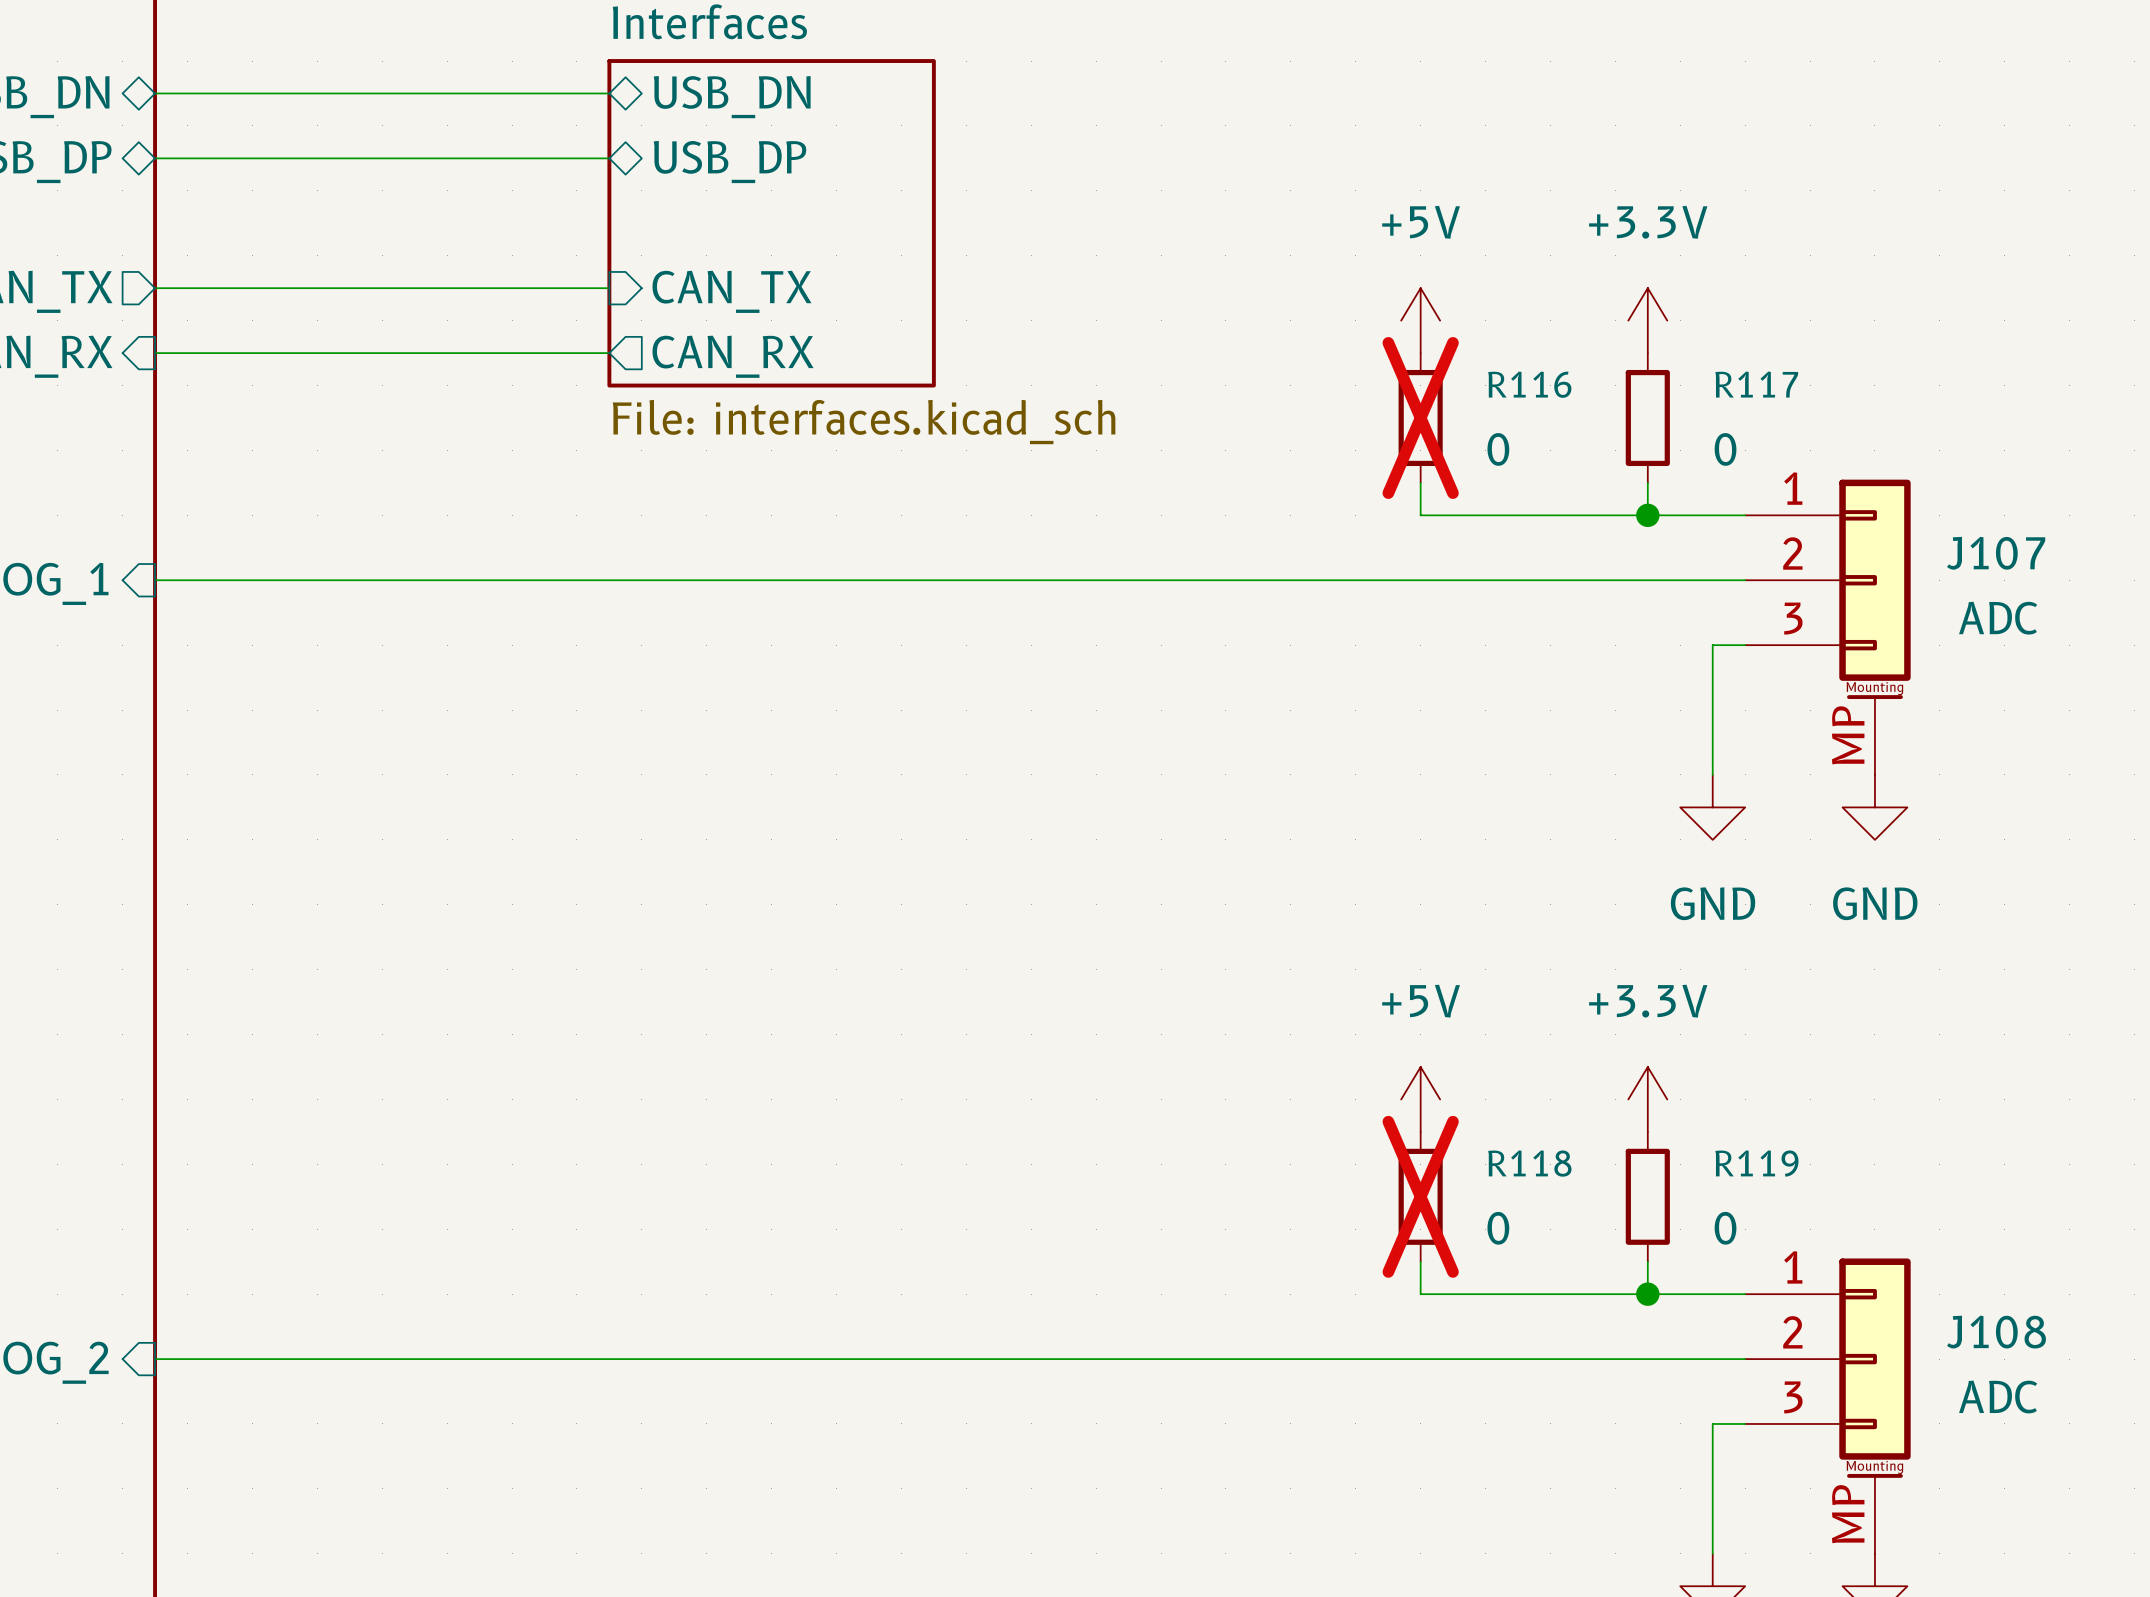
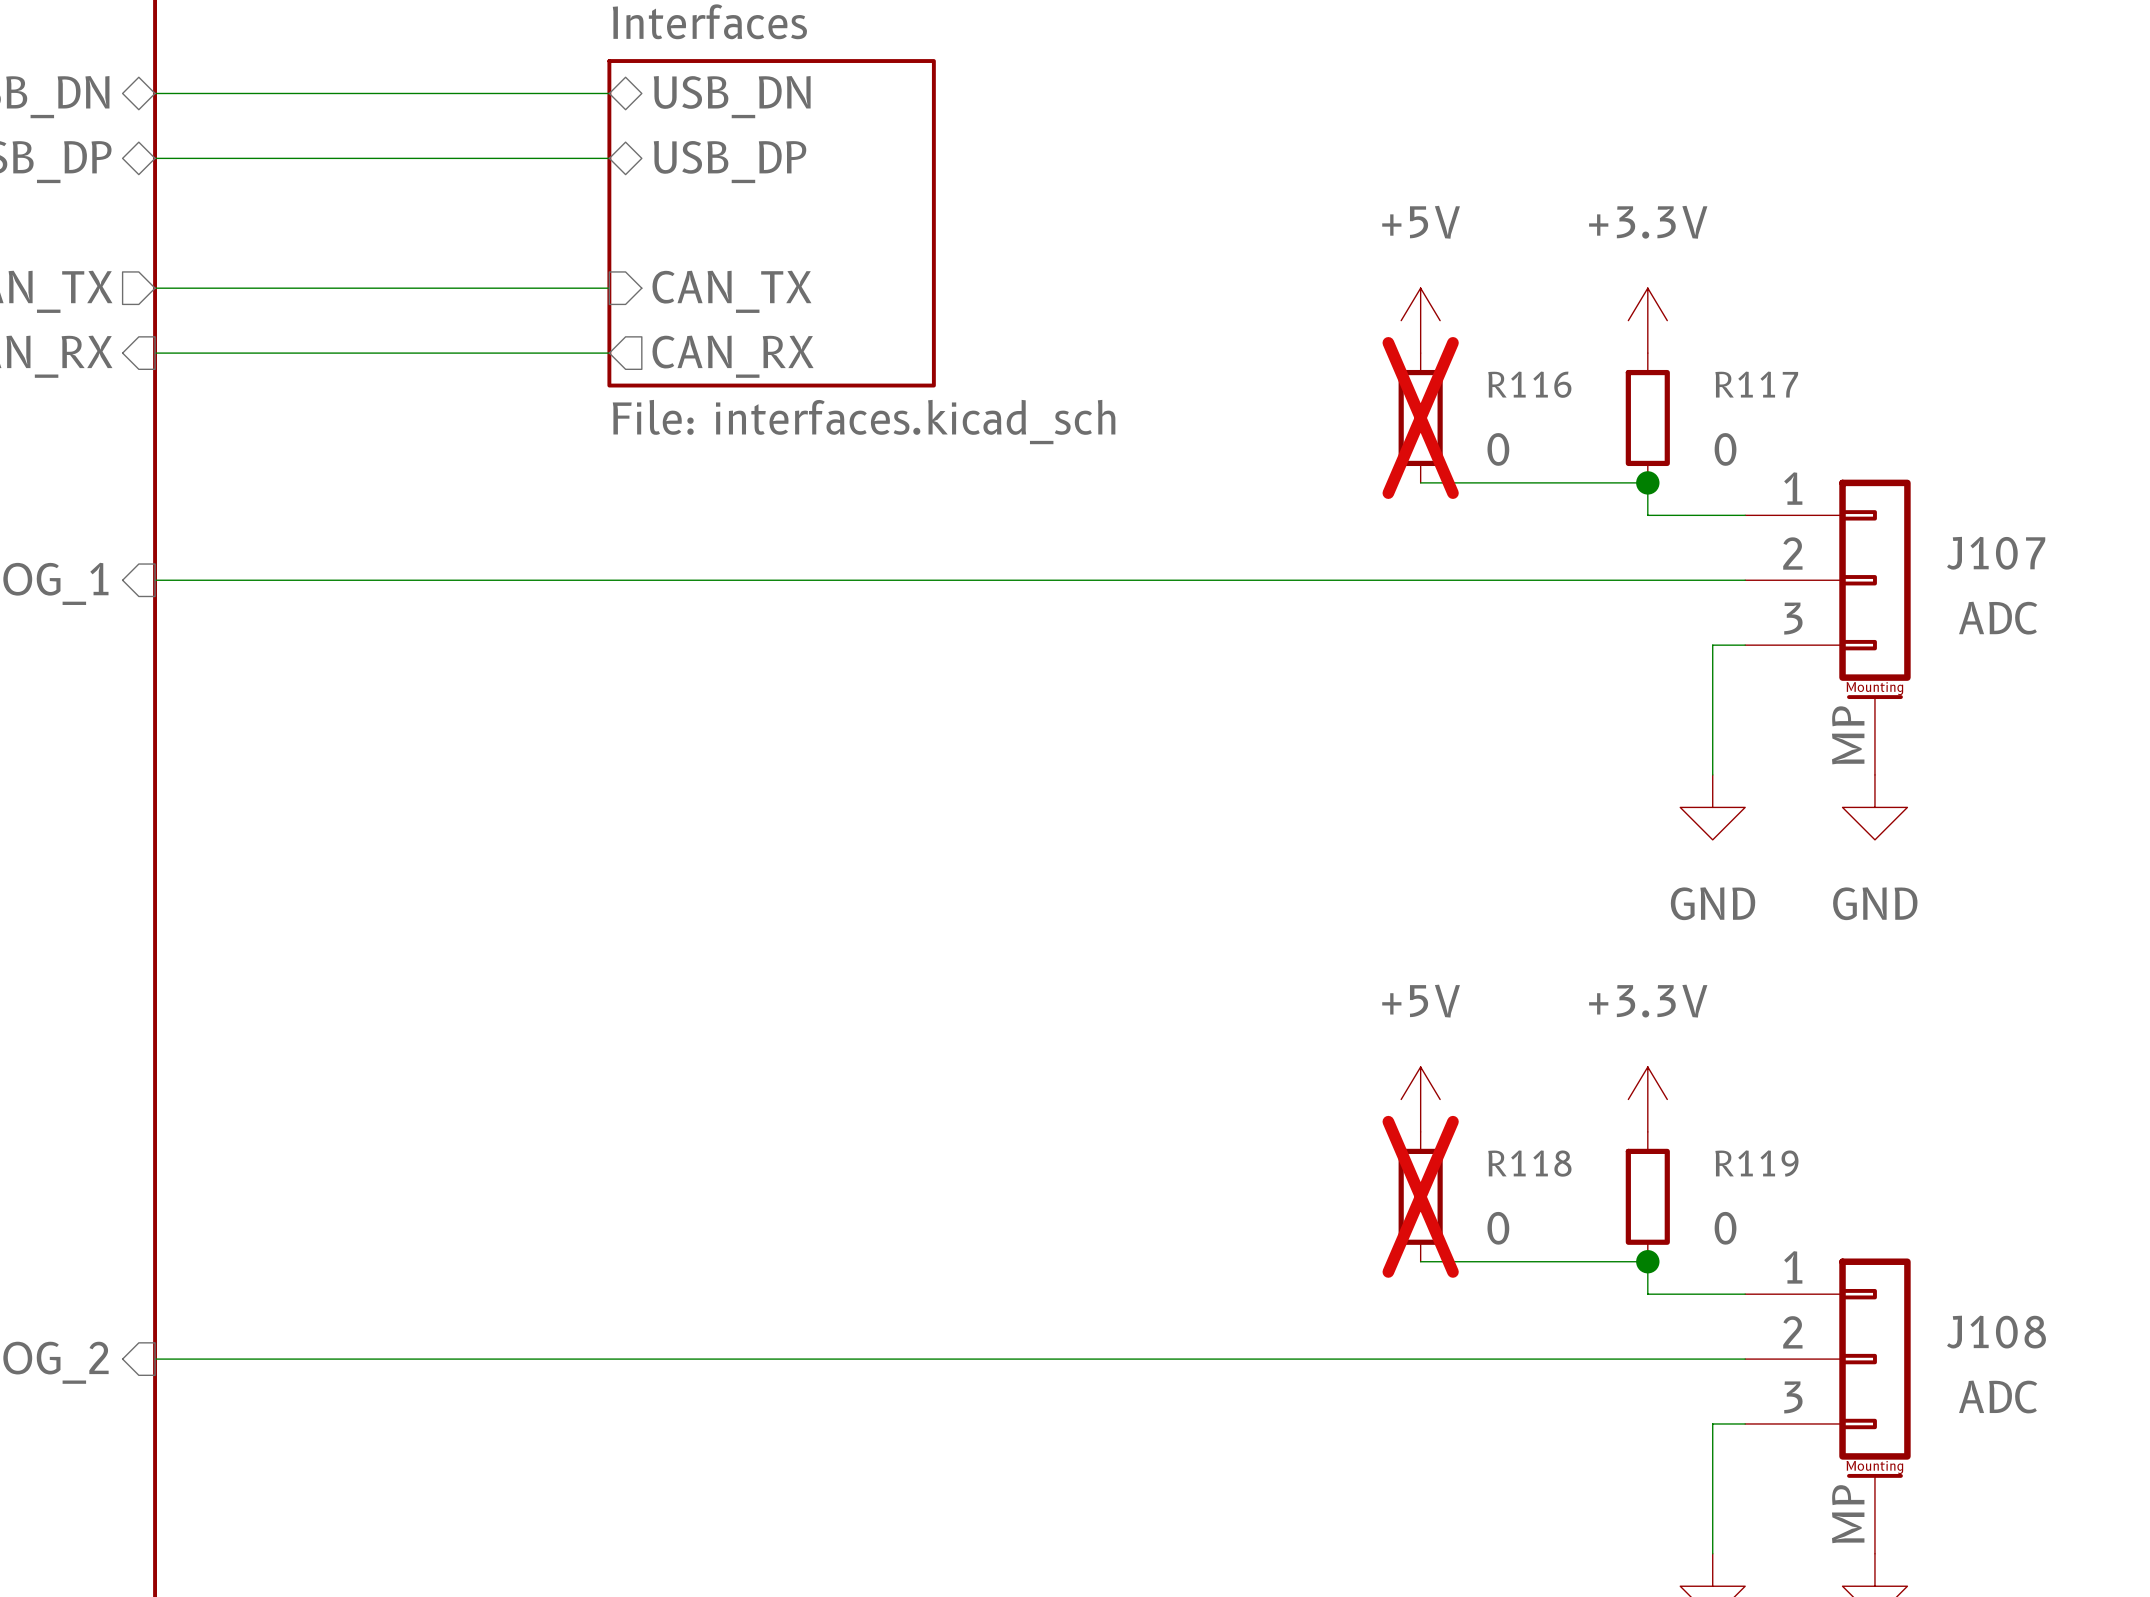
wire: (1420, 482) (1420, 515) (1647, 515) -> (1420, 482) (1647, 482)
junction position: (1647, 515) -> (1647, 482)
wire: (1420, 1261) (1420, 1294) (1647, 1294) -> (1420, 1261) (1647, 1261)
junction position: (1647, 1294) -> (1647, 1261)

